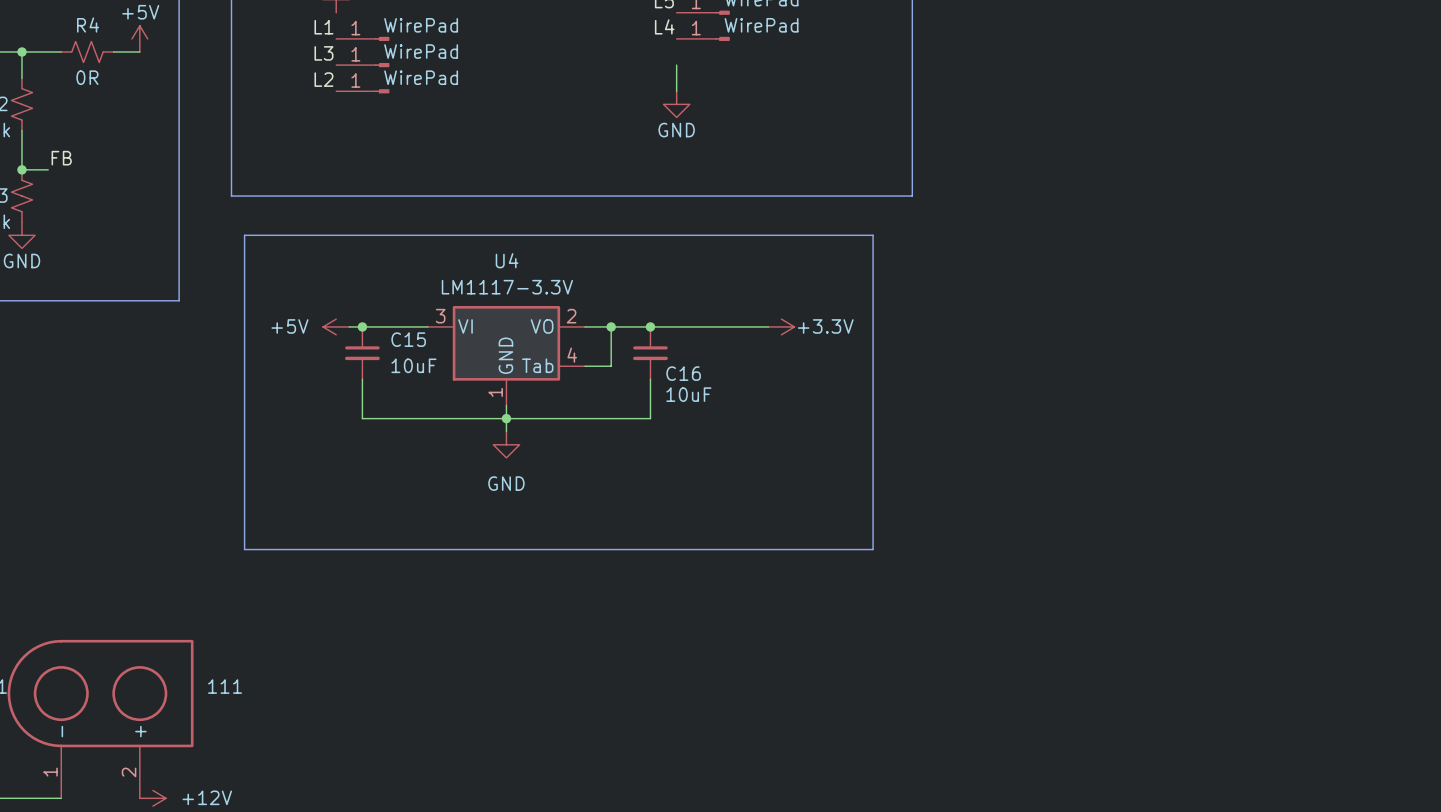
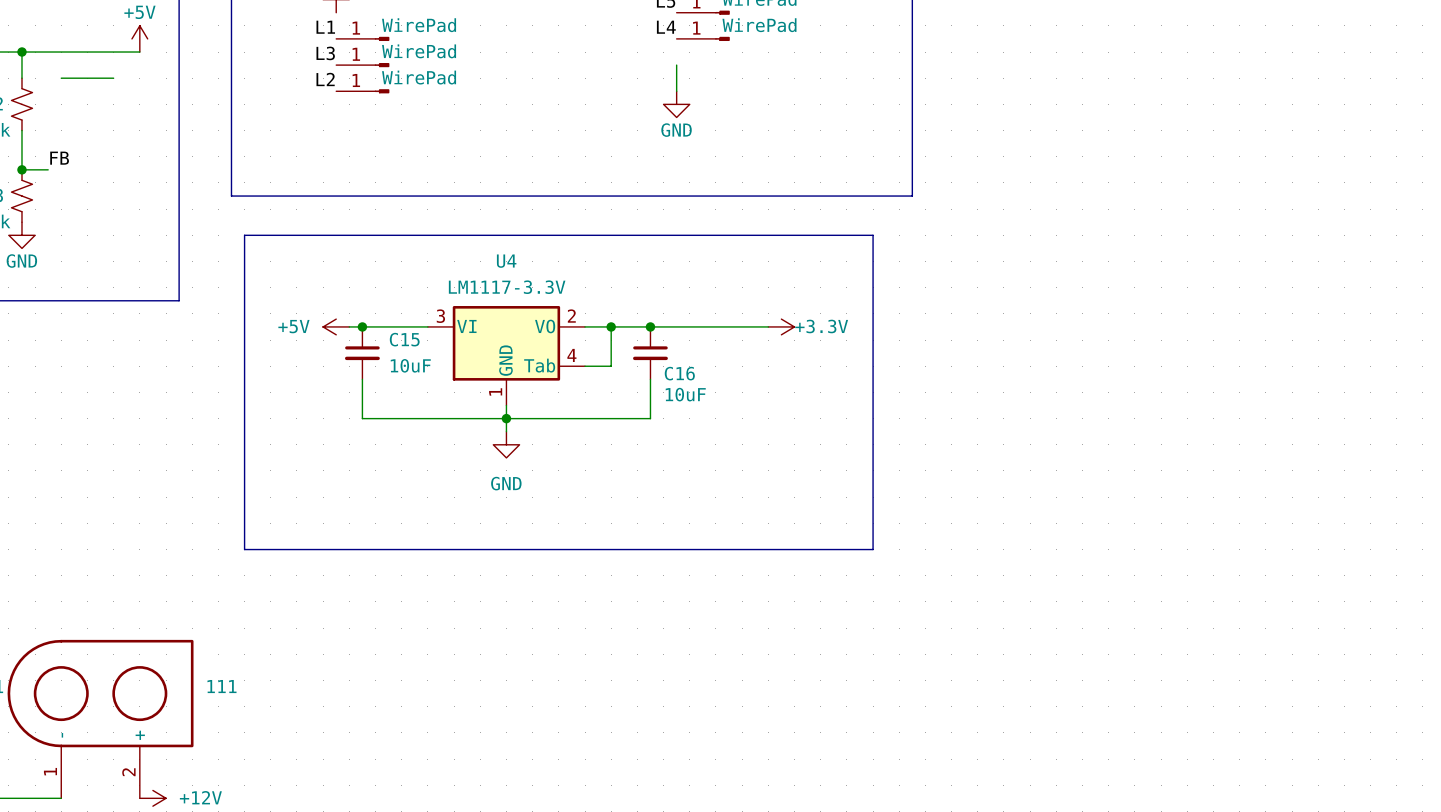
R4: 0R (87, 52) -> none
wire: none -> (61, 78) (113, 78)

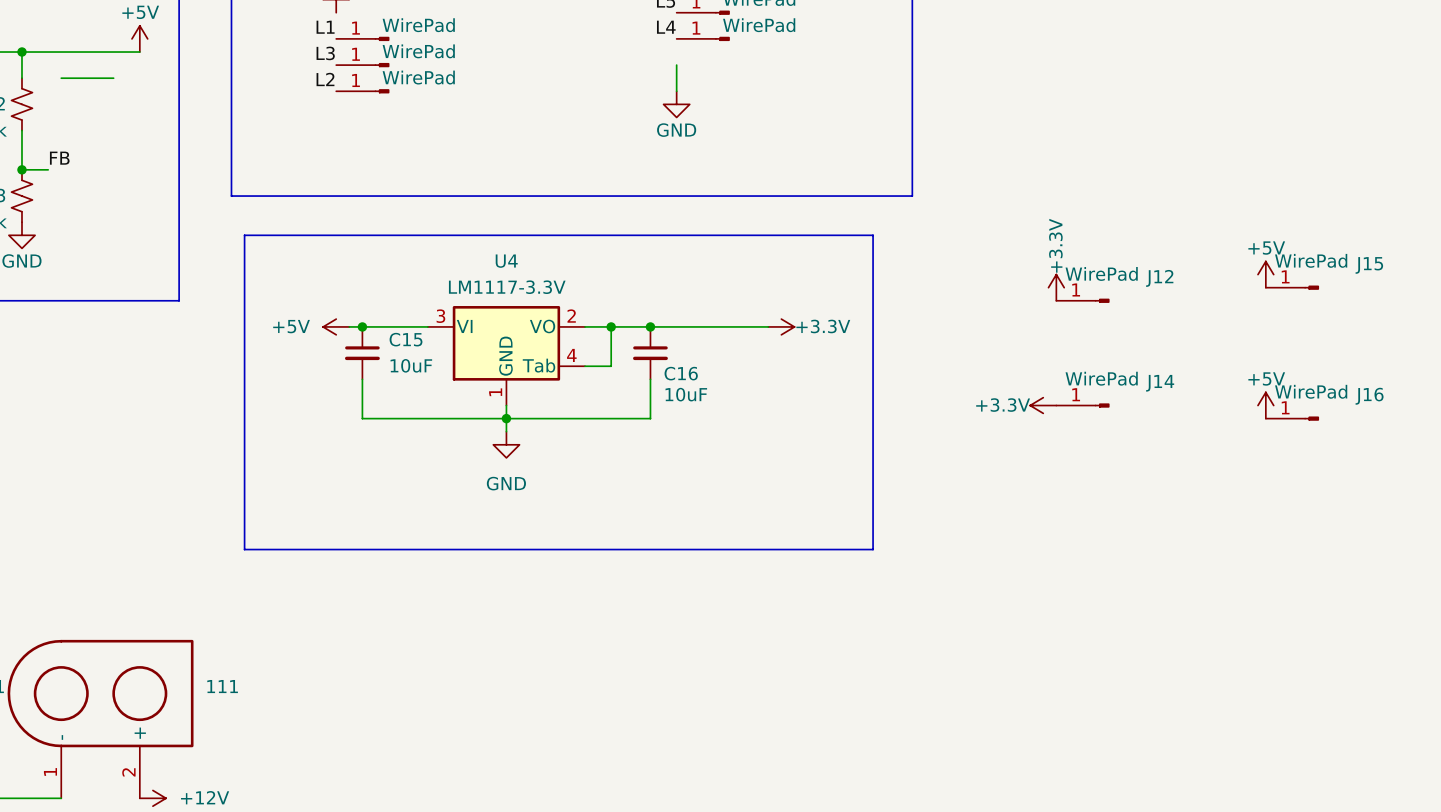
power symbol: none -> +5V (1265, 274)
power symbol: none -> +3.3V (1056, 287)
J15: none -> WirePad (1292, 287)
J12: none -> WirePad (1082, 300)
power symbol: none -> +3.3V (1043, 405)
J14: none -> WirePad (1082, 405)
power symbol: none -> +5V (1265, 405)
J16: none -> WirePad (1292, 418)

